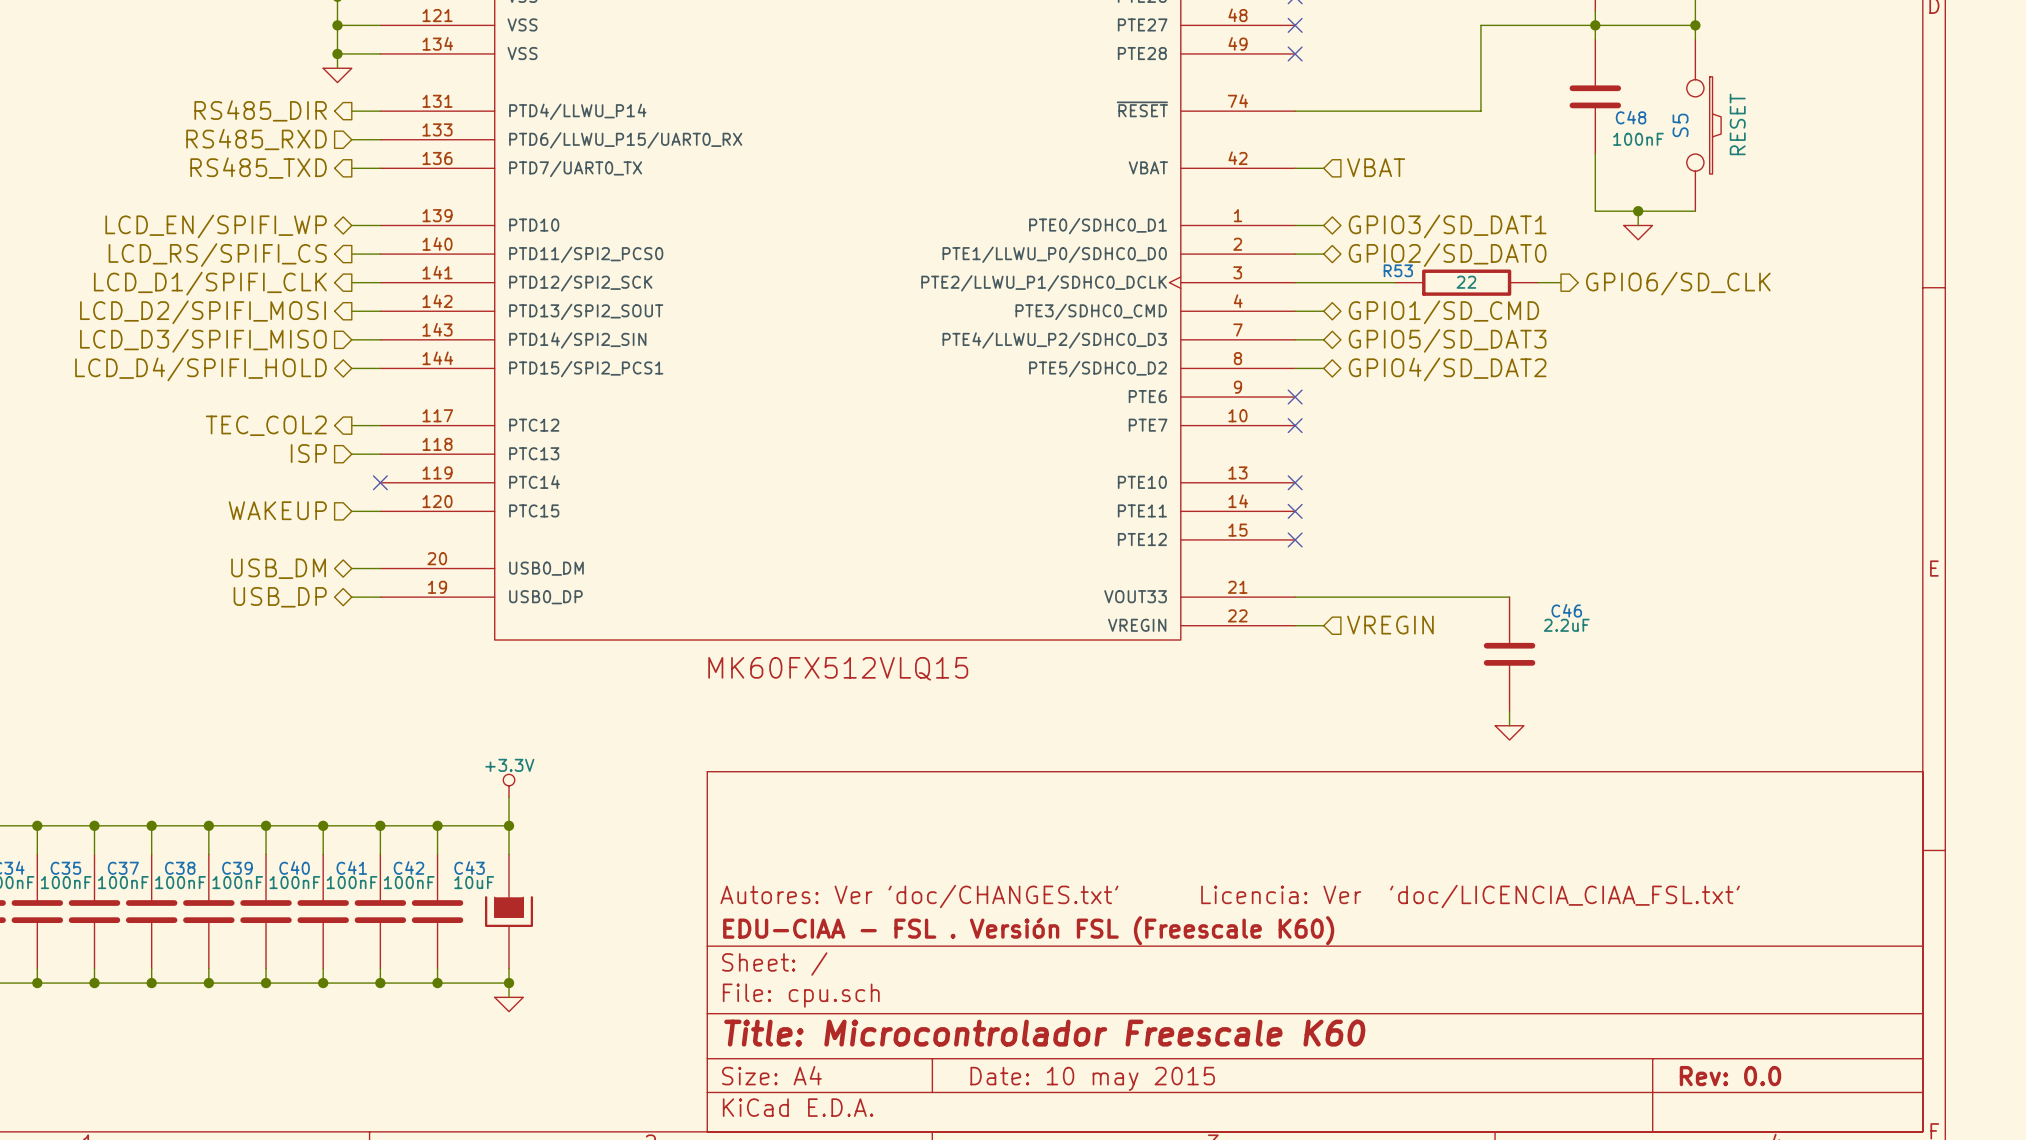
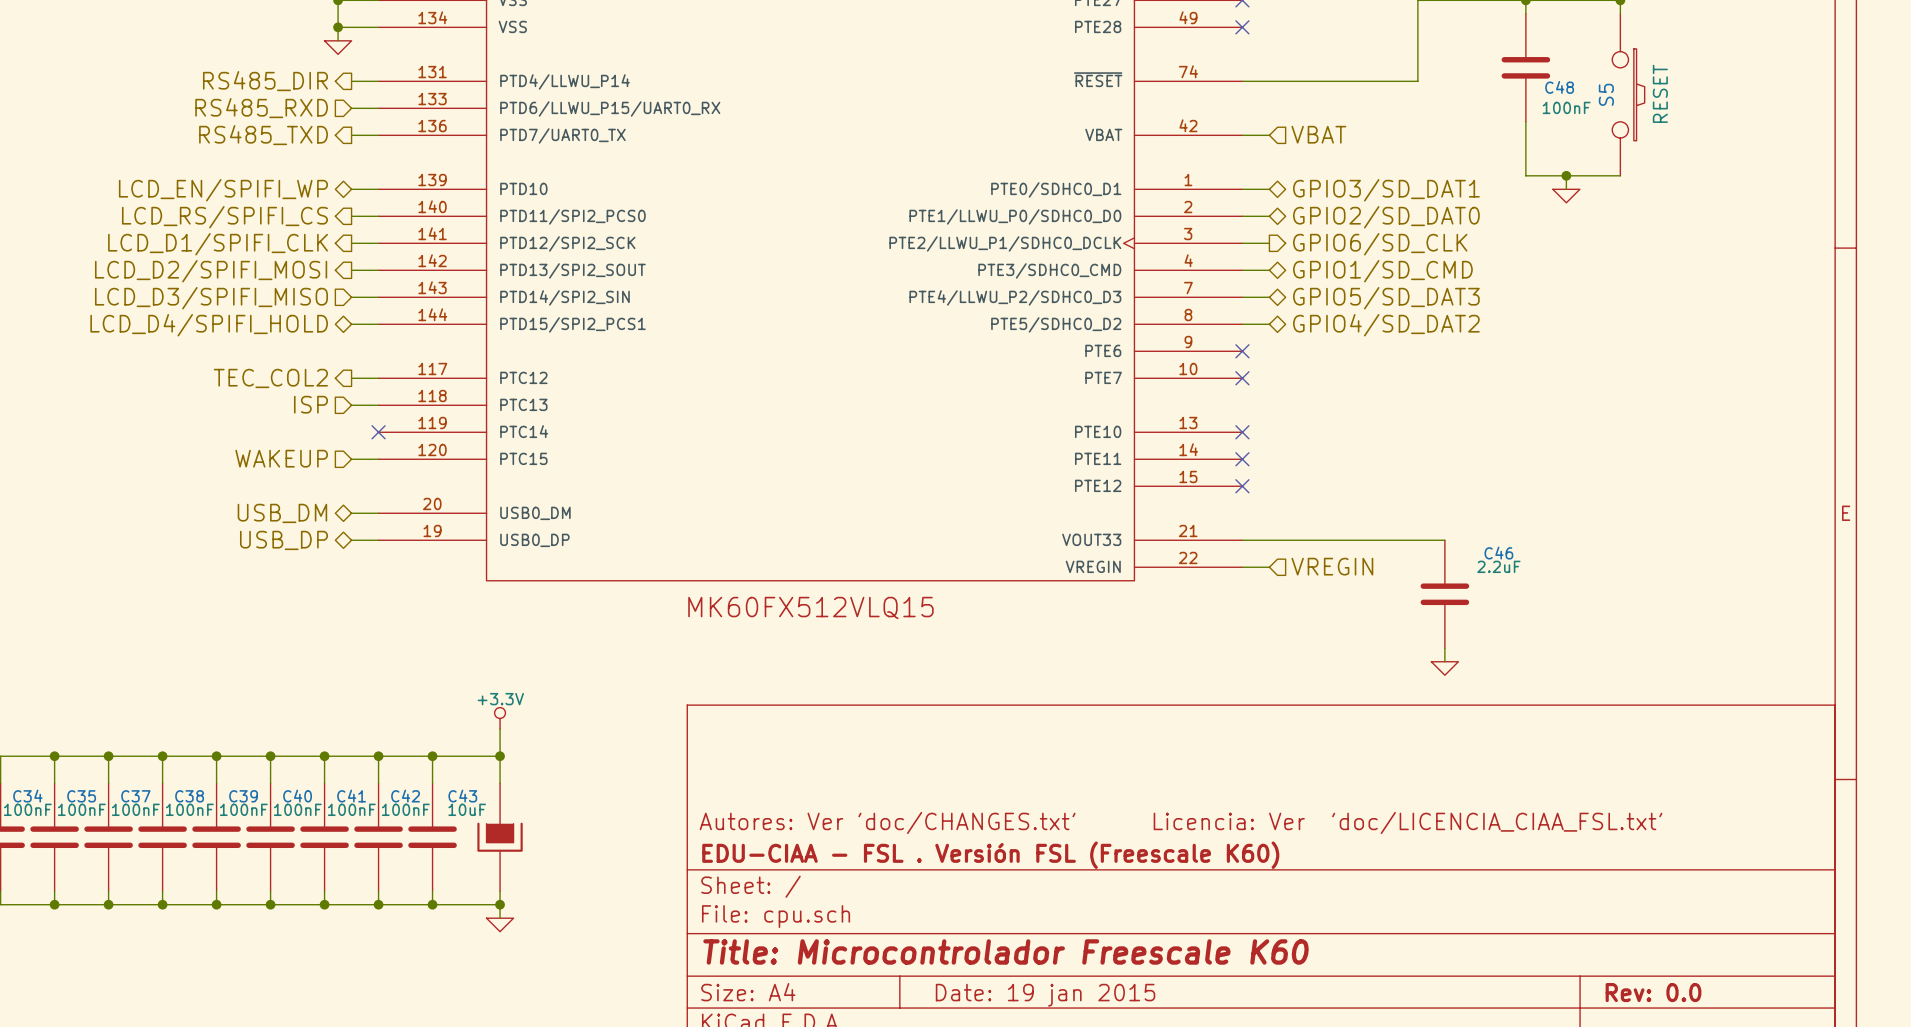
wire: (1323, 282) (1395, 282) -> none
R53: 22 (1466, 282) -> none
wire: (1538, 282) (1561, 282) -> none
hierarchical label position: GPIO6/SD_CLK (1678, 283) -> GPIO6/SD_CLK (1380, 244)
title block: Date: 10 may 2015 (1092, 1078) -> Date: 19 jan 2015 (1045, 995)

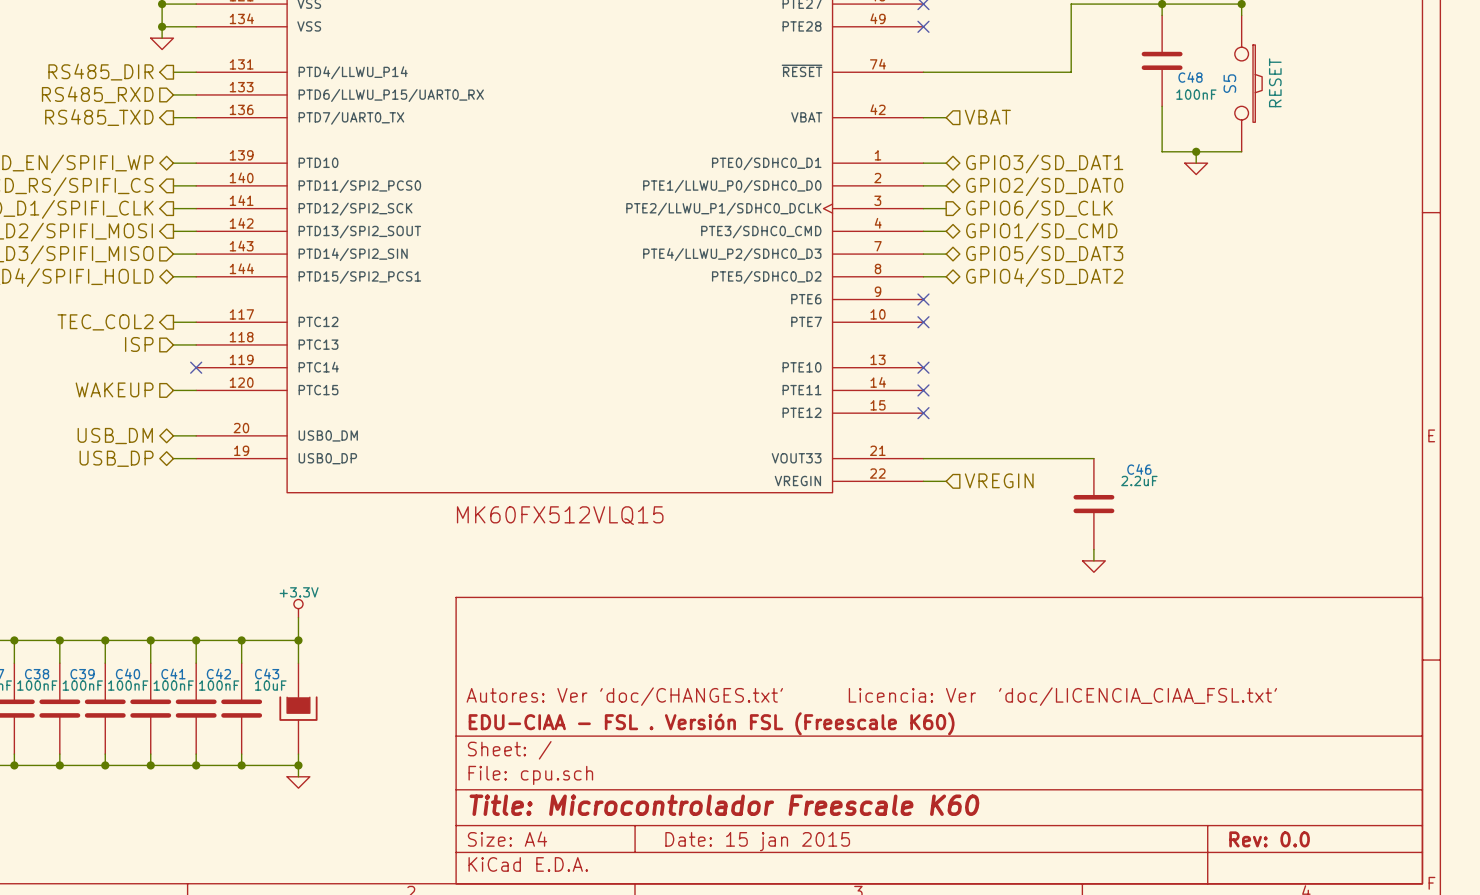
title block: Date: 19 jan 2015 (1045, 995) -> Date: 15 jan 2015 (757, 841)

